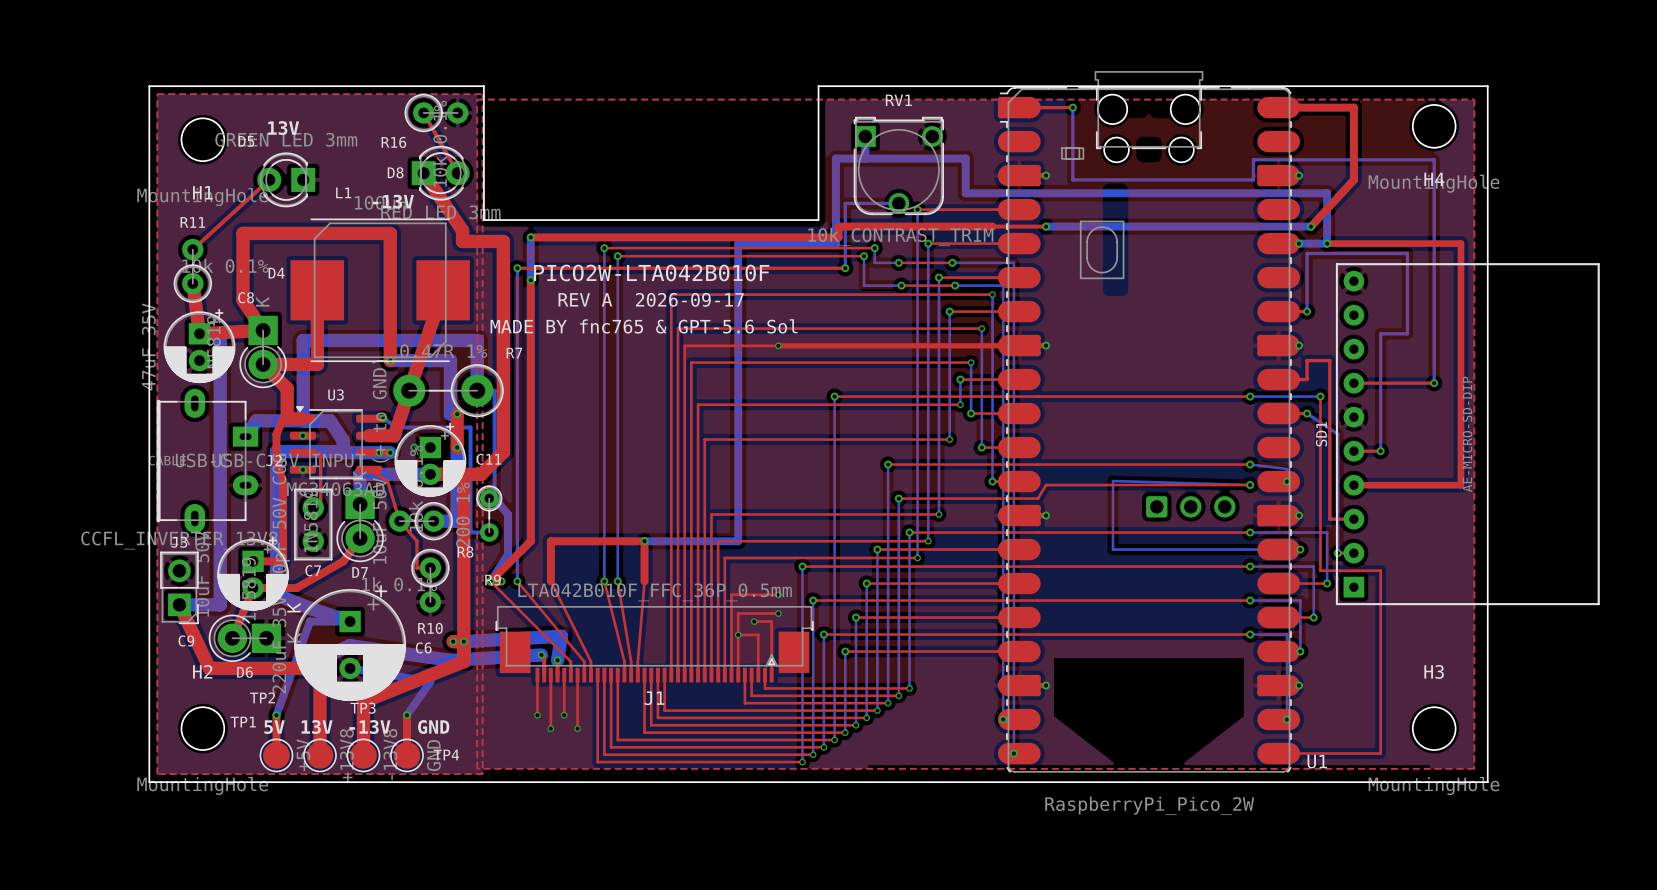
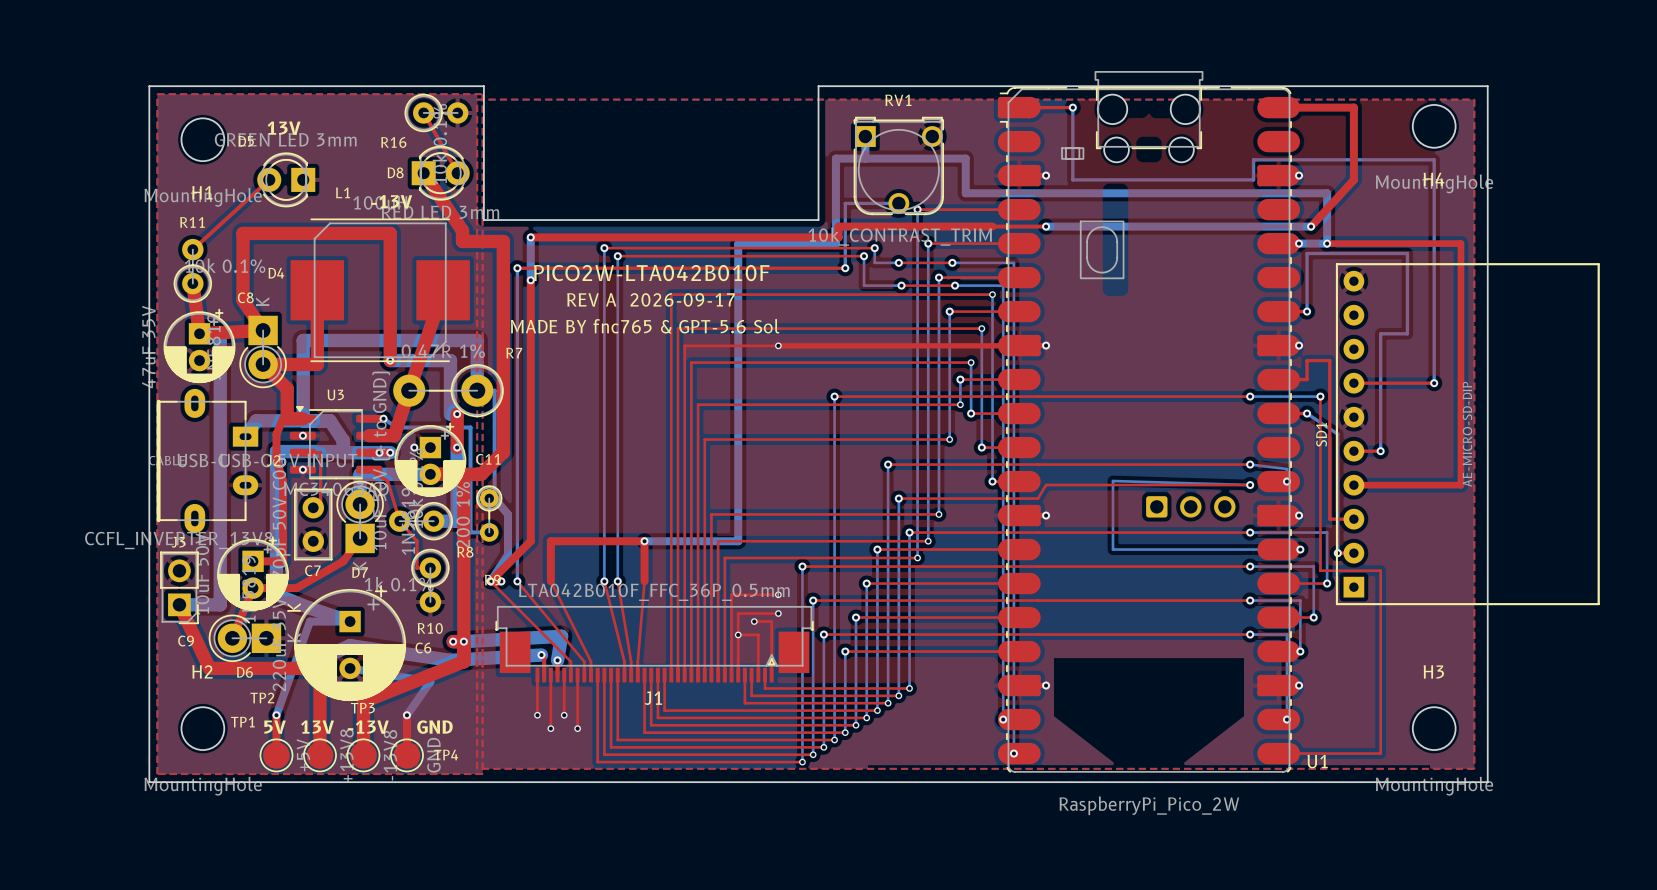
D7 rotation: 0° (360, 525) -> 180° (360, 516)

